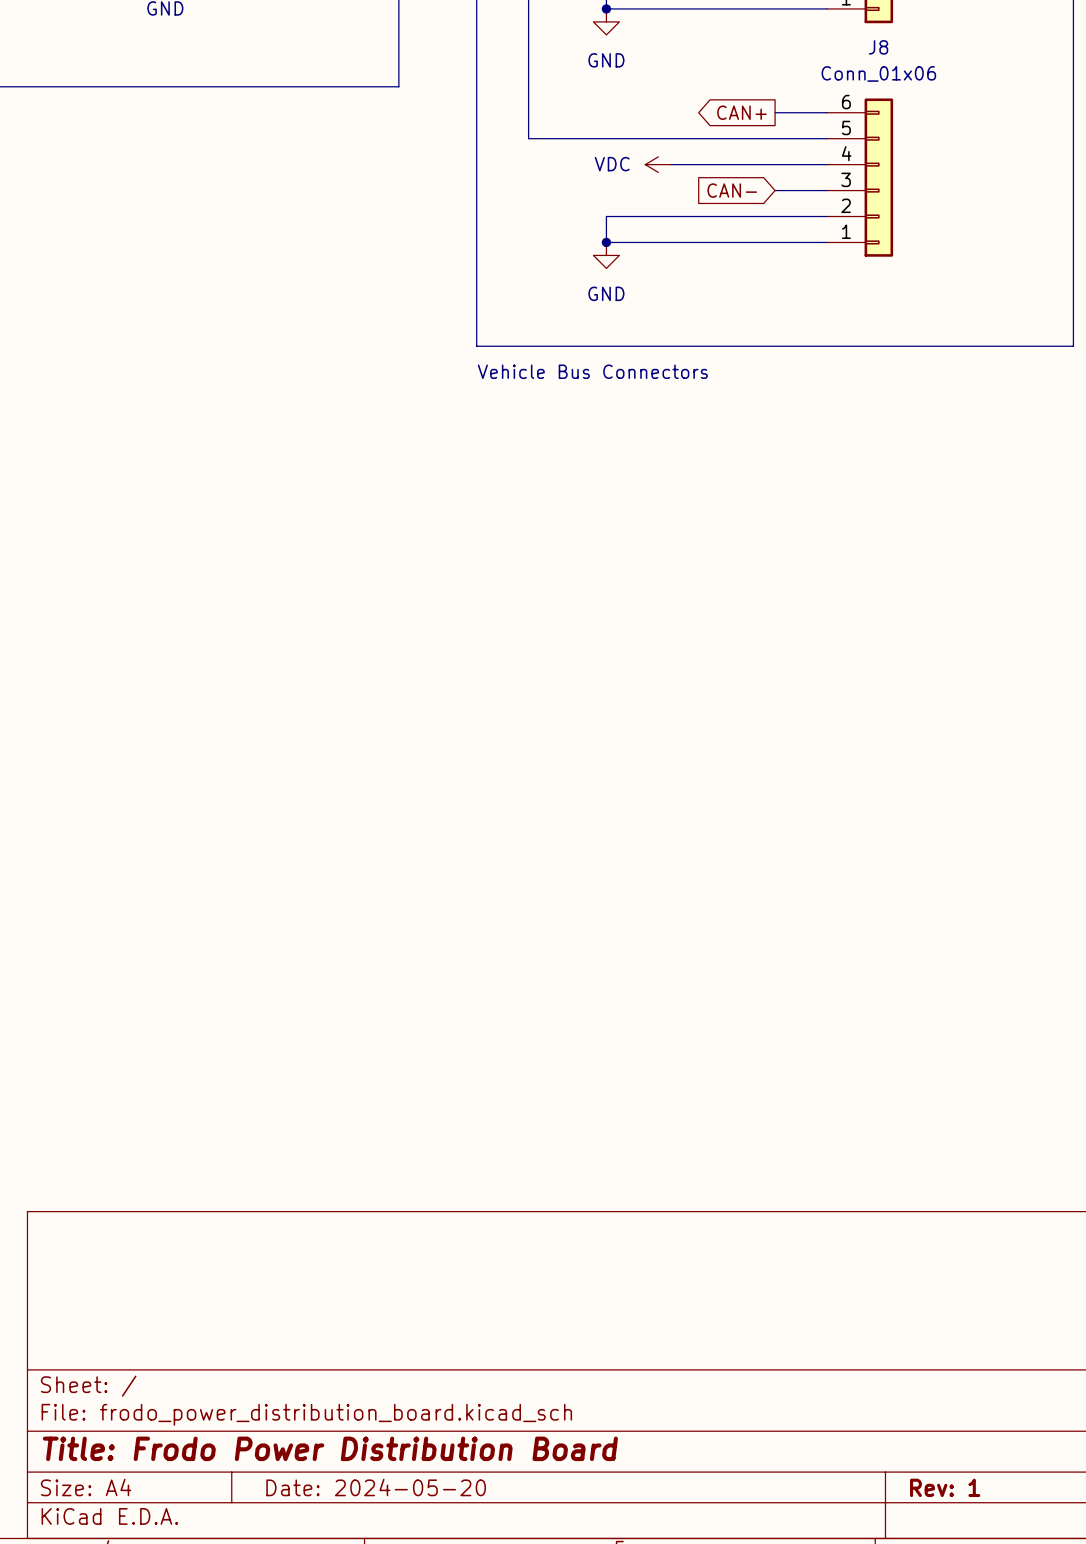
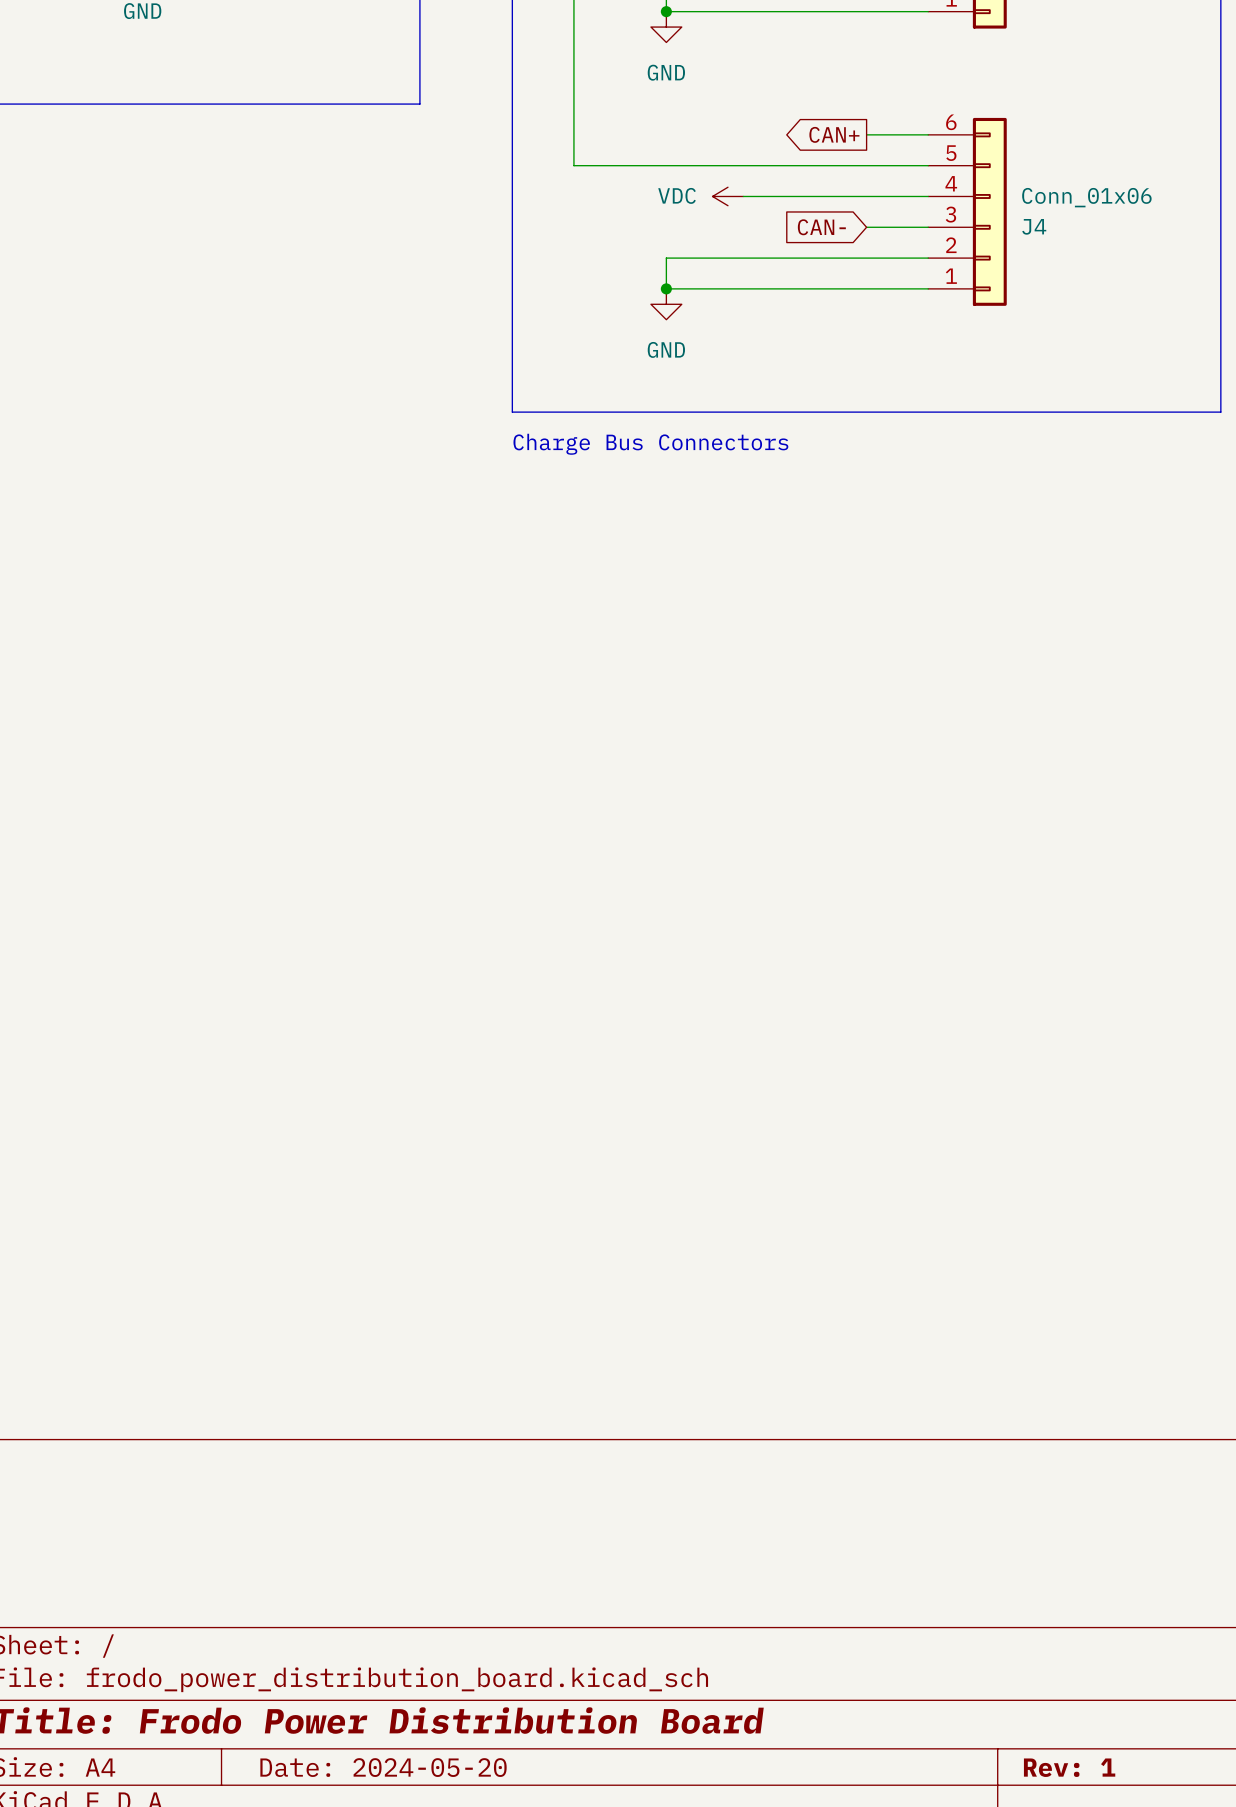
J8 name: J8 (878, 47) -> J4 (1034, 226)
J8 value position: Conn_01x06 (878, 73) -> Conn_01x06 (1086, 197)
text: Vehicle Bus Connectors (592, 371) -> Charge Bus Connectors (650, 444)

